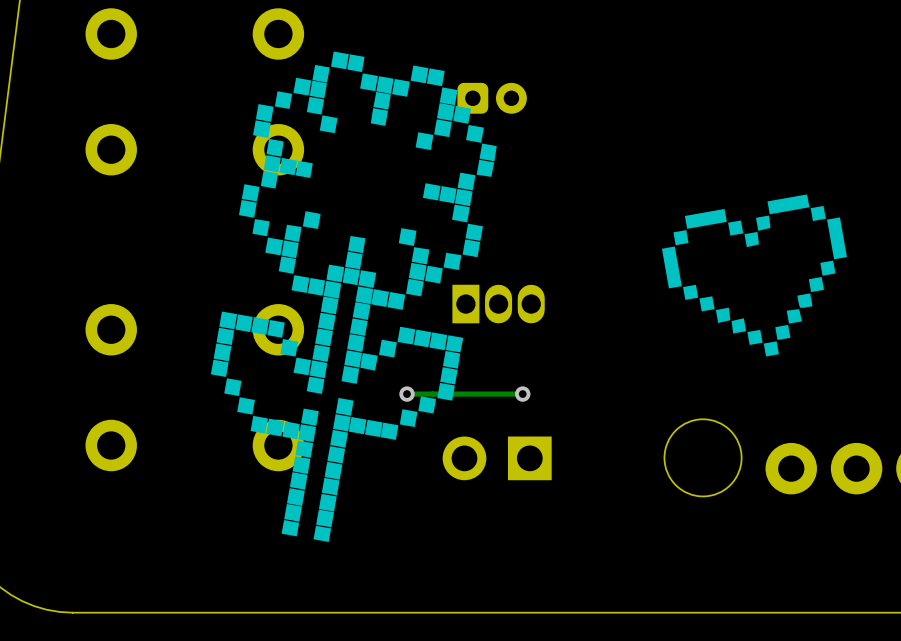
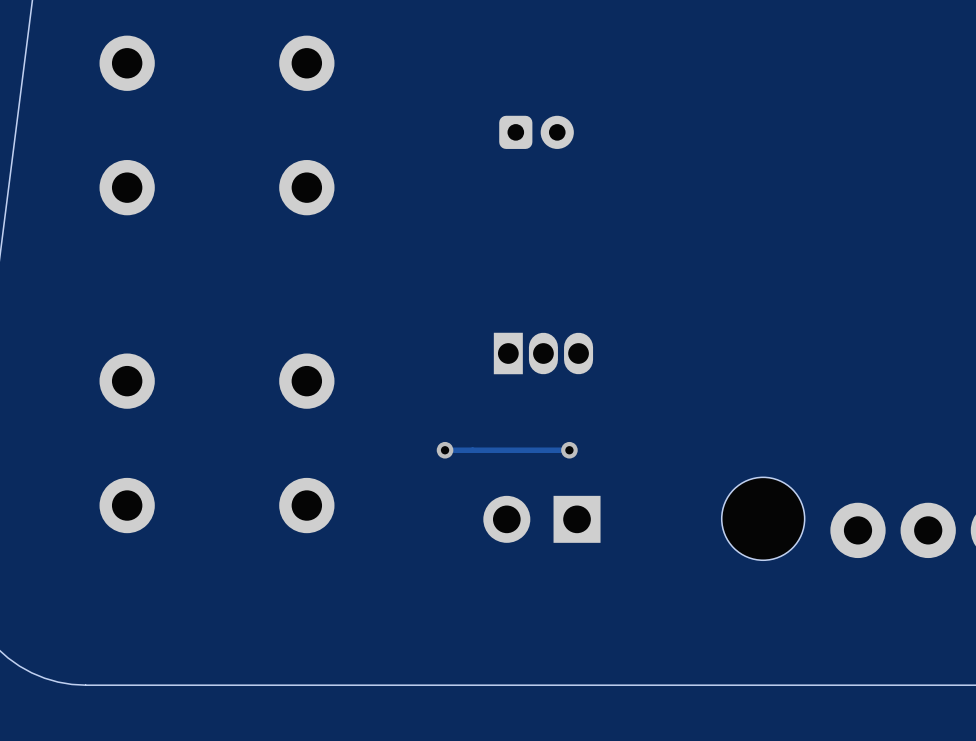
drawing: [210, 51, 497, 542] -> none
drawing: [661, 194, 847, 357] -> none

